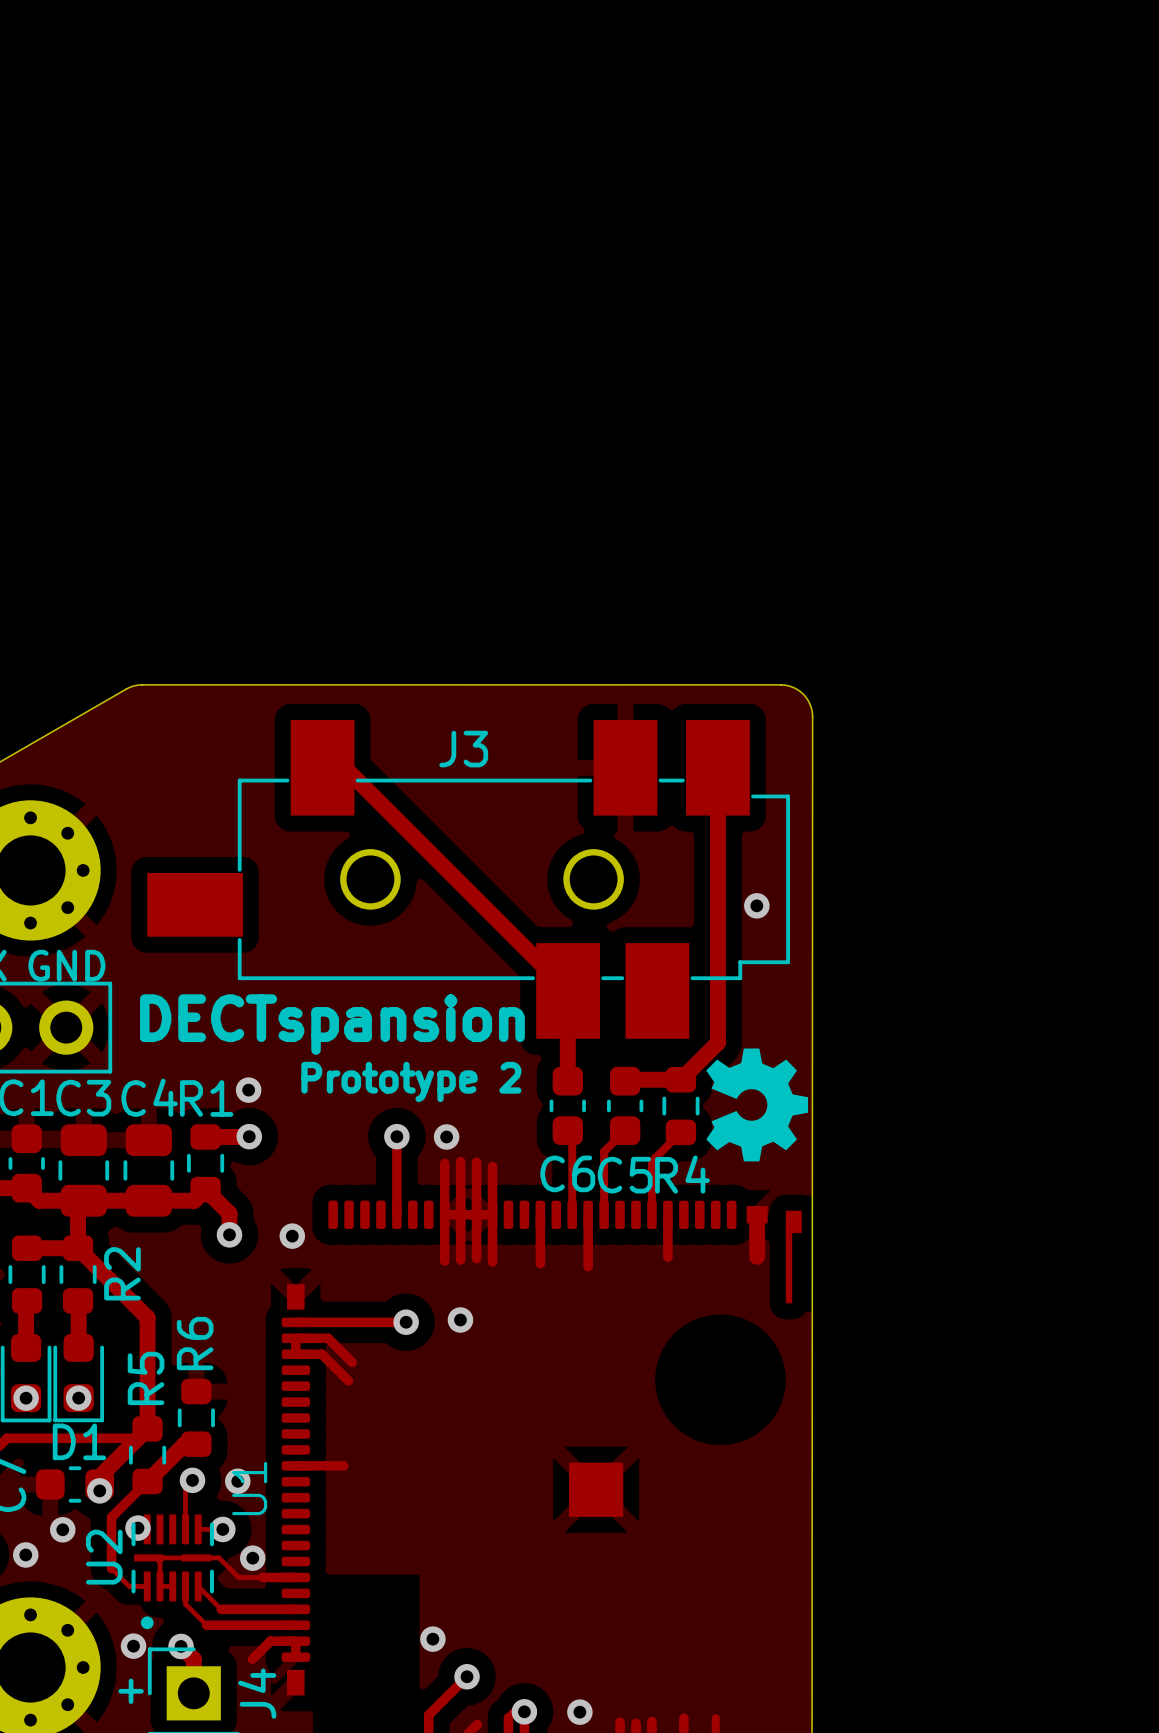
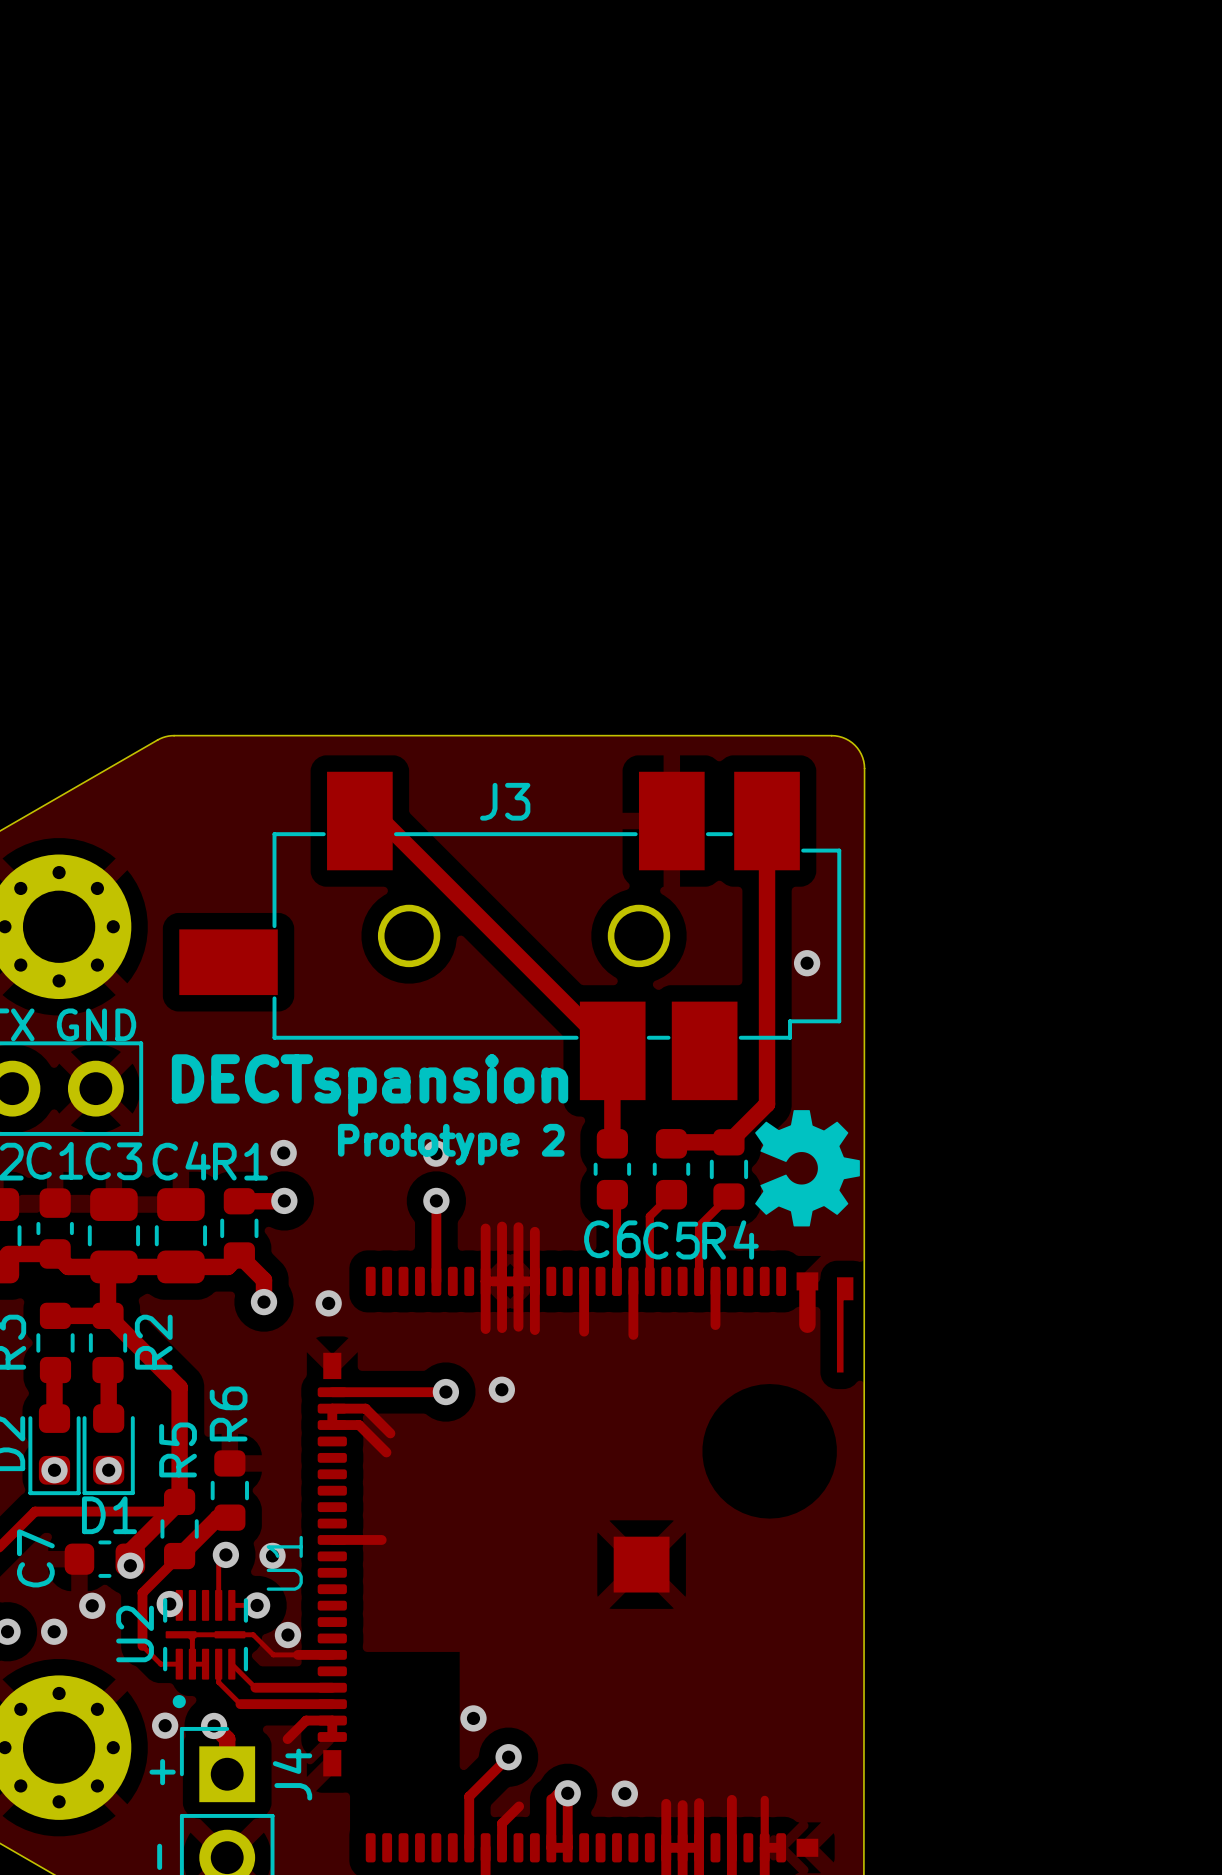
via position: (446, 1136) -> (436, 1153)

